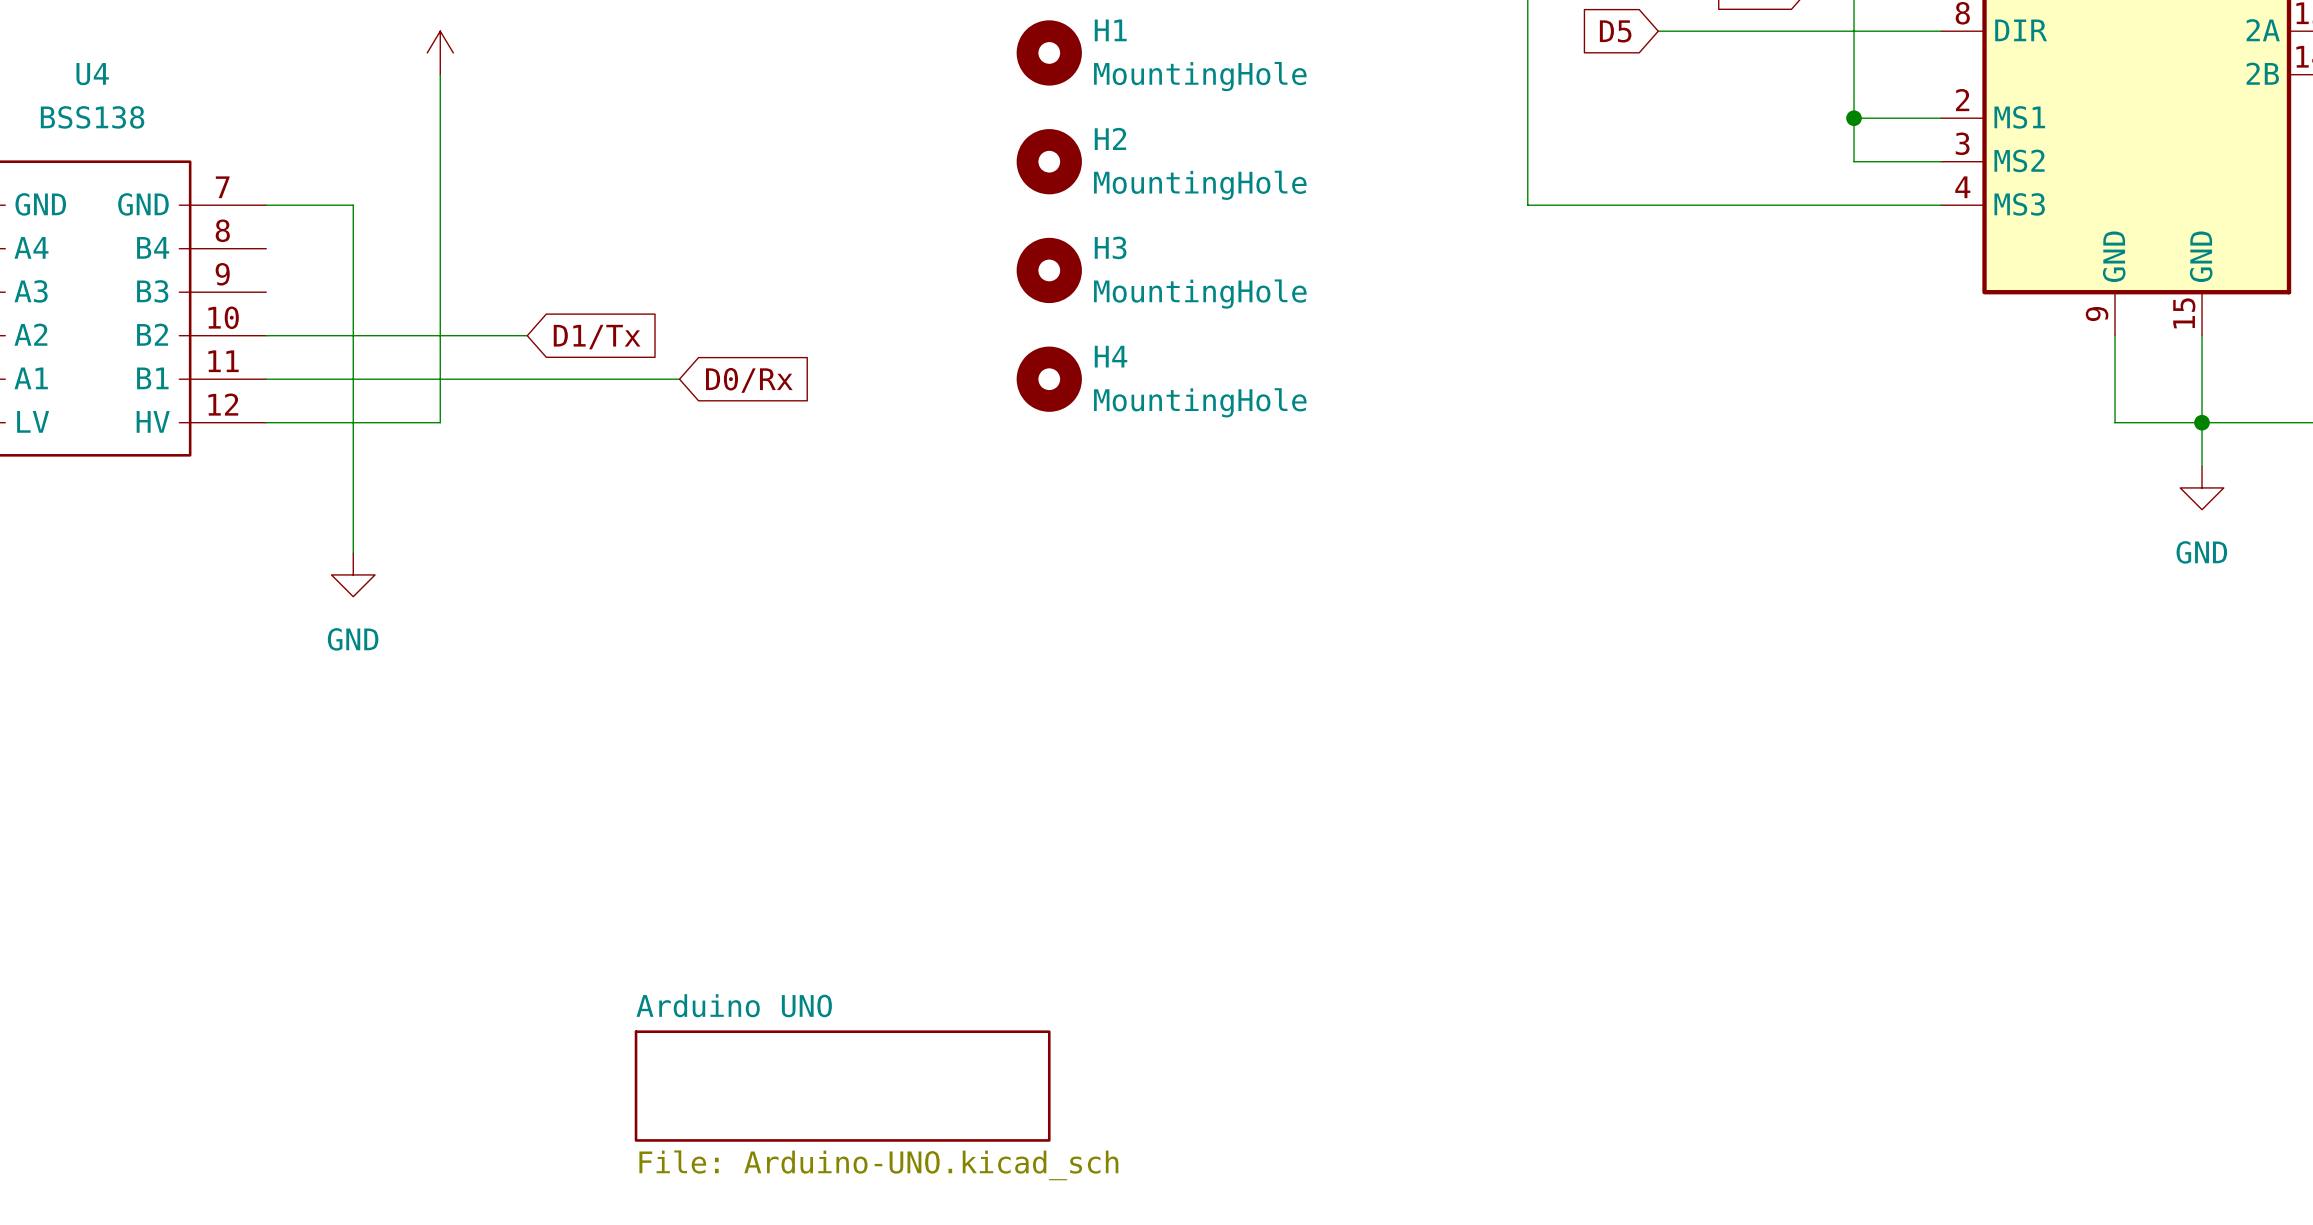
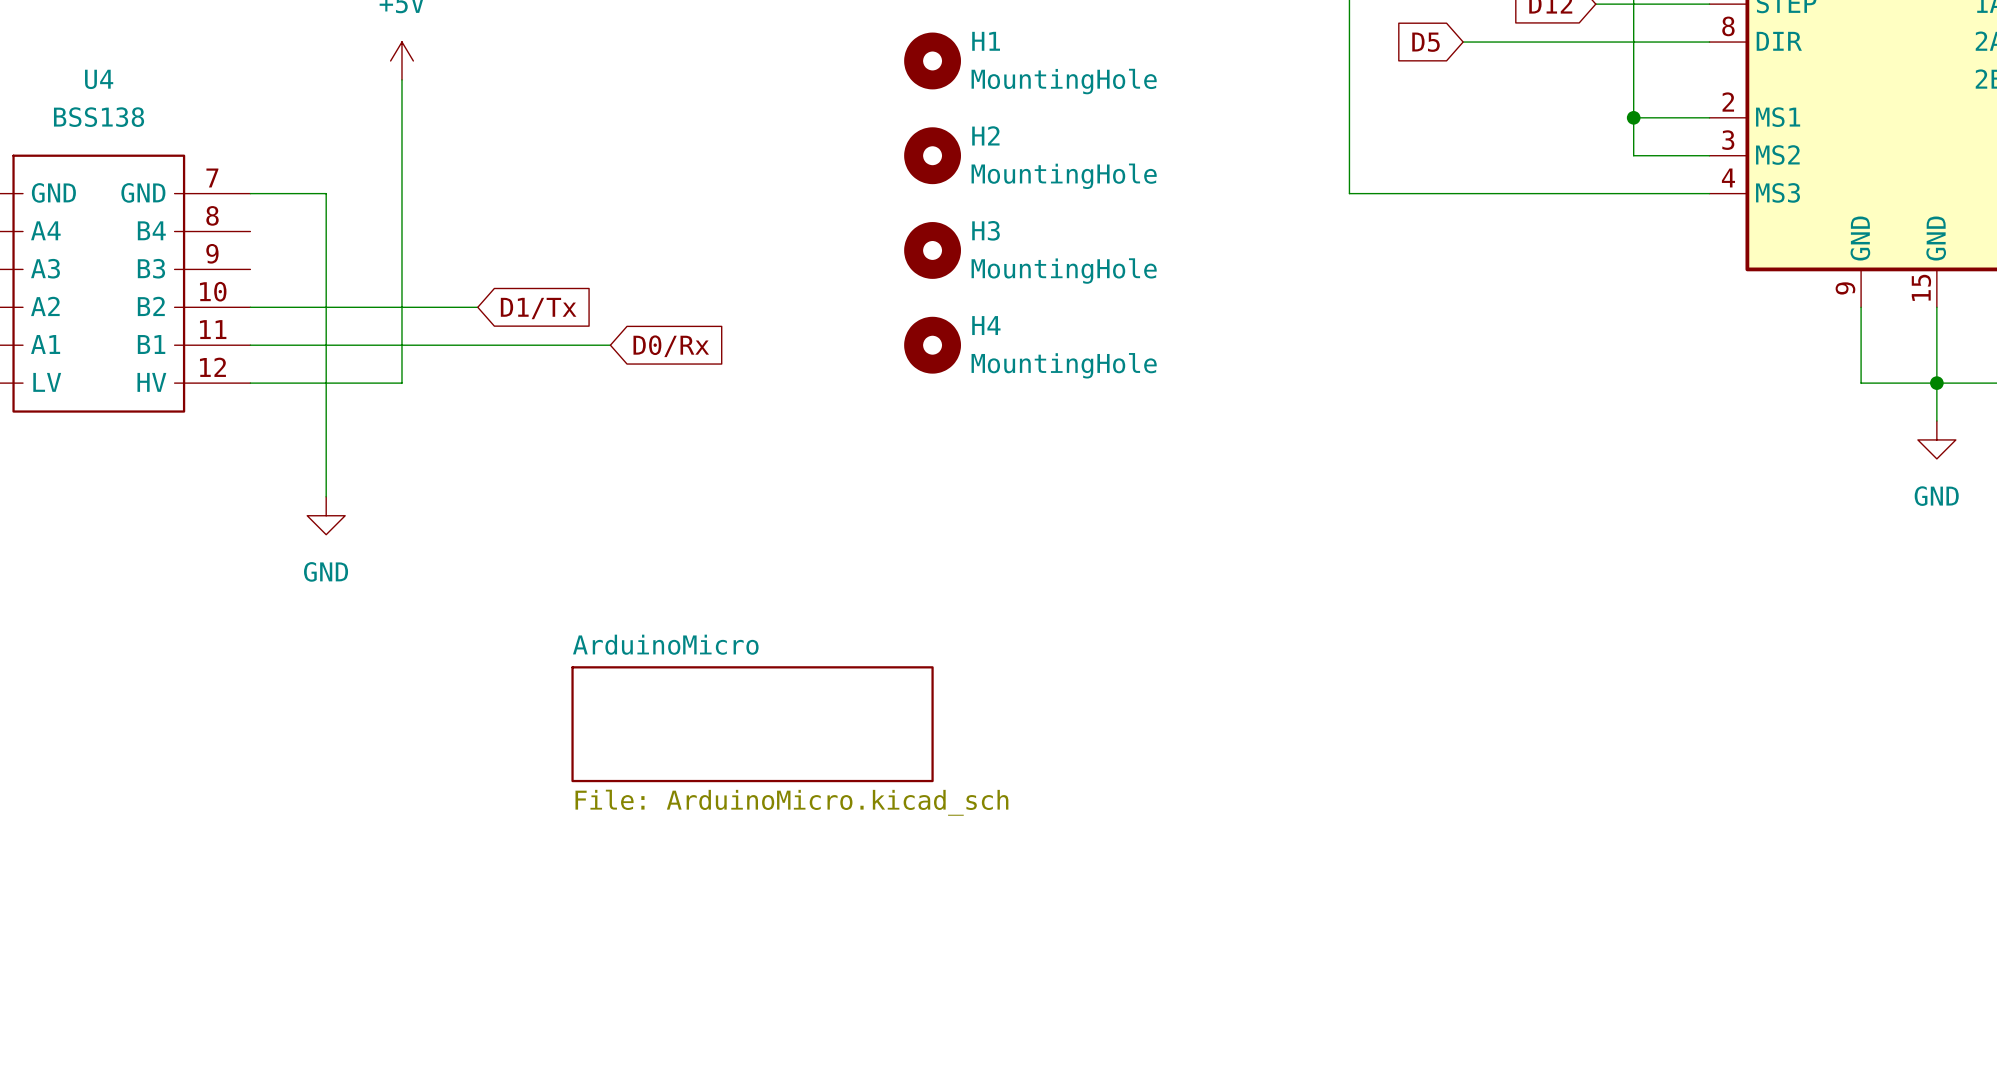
sheet ArduinoMicro: none -> File: ArduinoMicro.kicad_sch (752, 724)
sheet Arduino UNO: File: Arduino-UNO.kicad_sch (842, 1086) -> none

